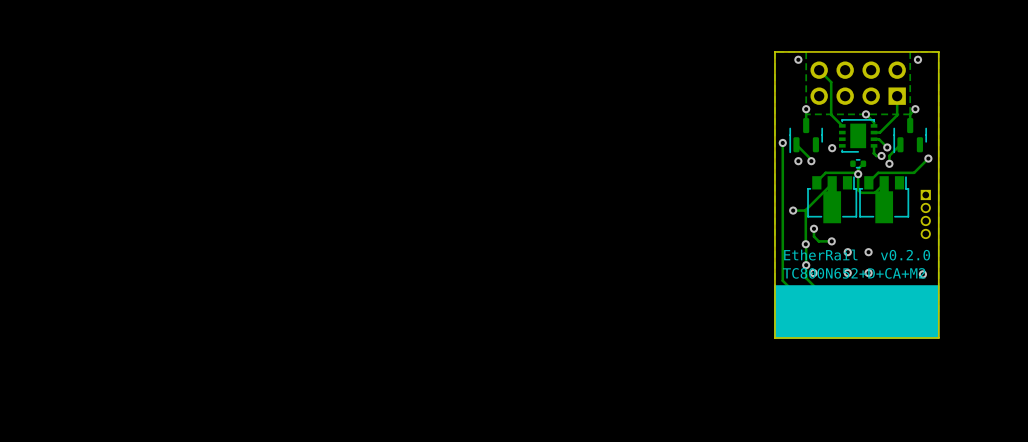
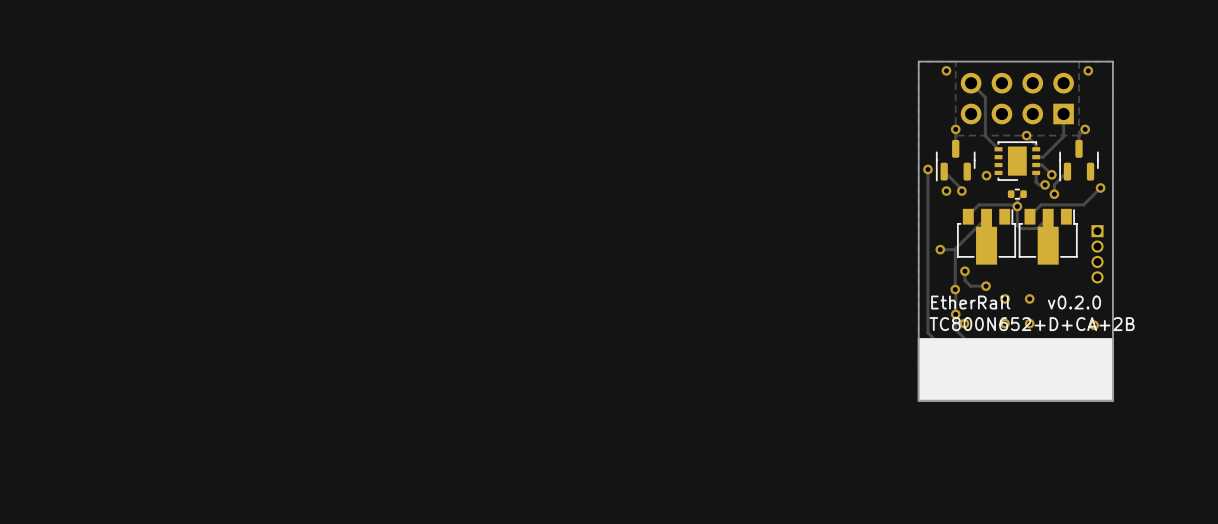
text: TC800N652+D+CA+M2 (854, 273) -> TC800N652+D+CA+2B (1032, 324)

